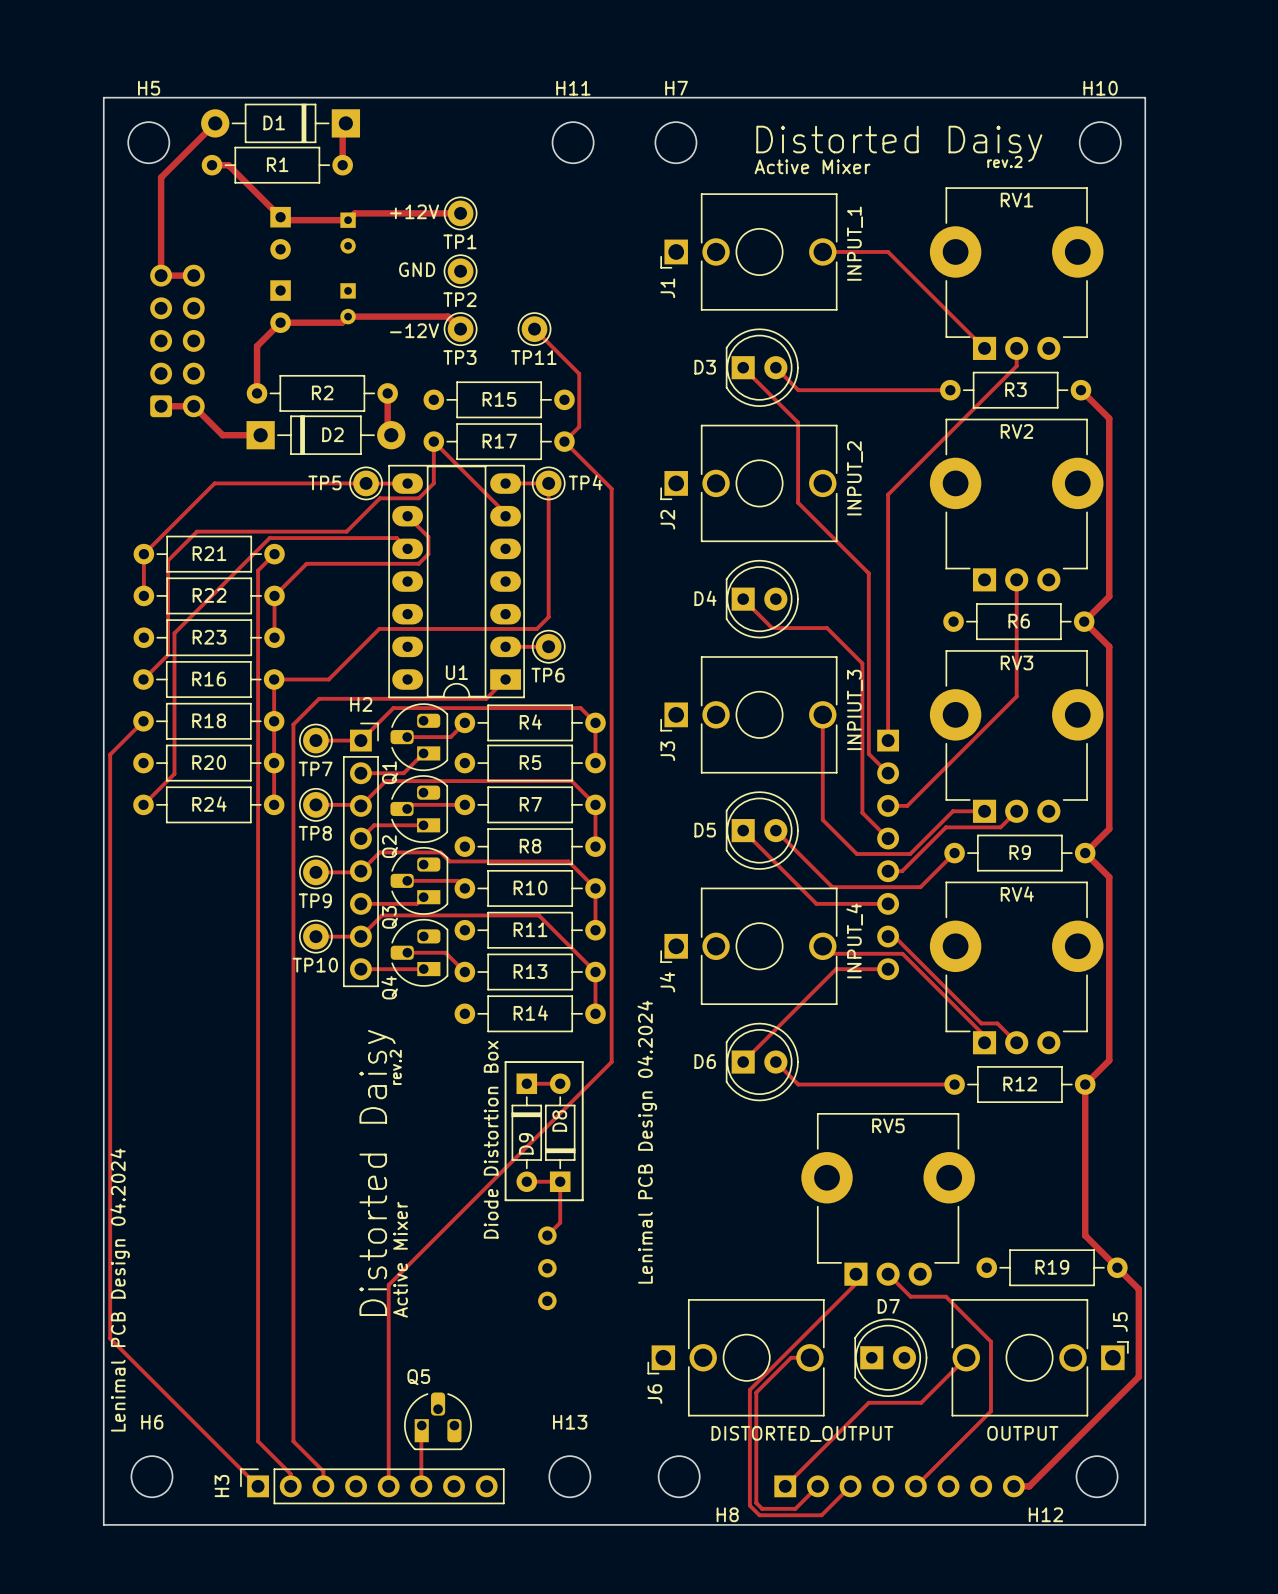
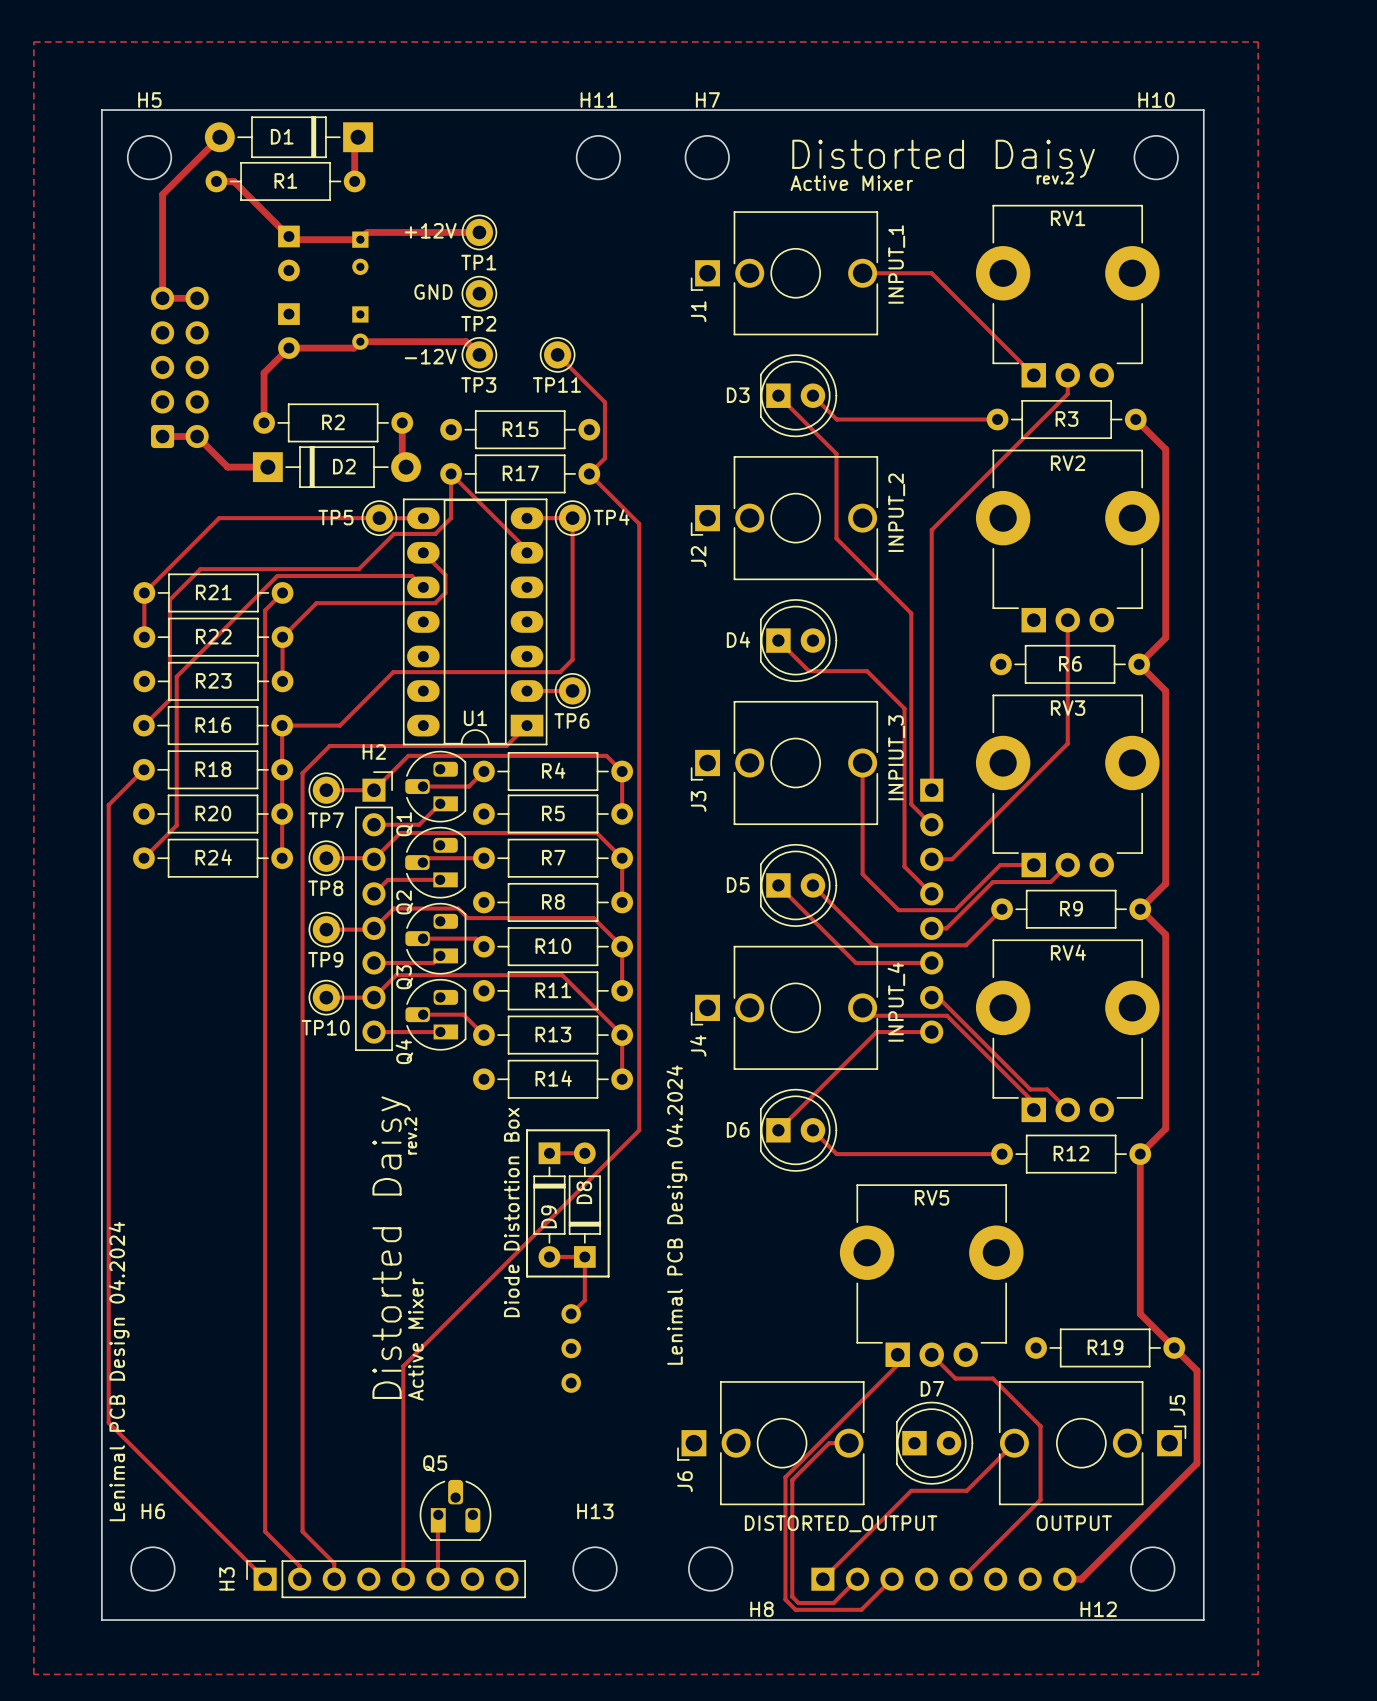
zone outline: none -> (33, 42) (1258, 42) (1258, 1674) (33, 1674) (33, 42)

